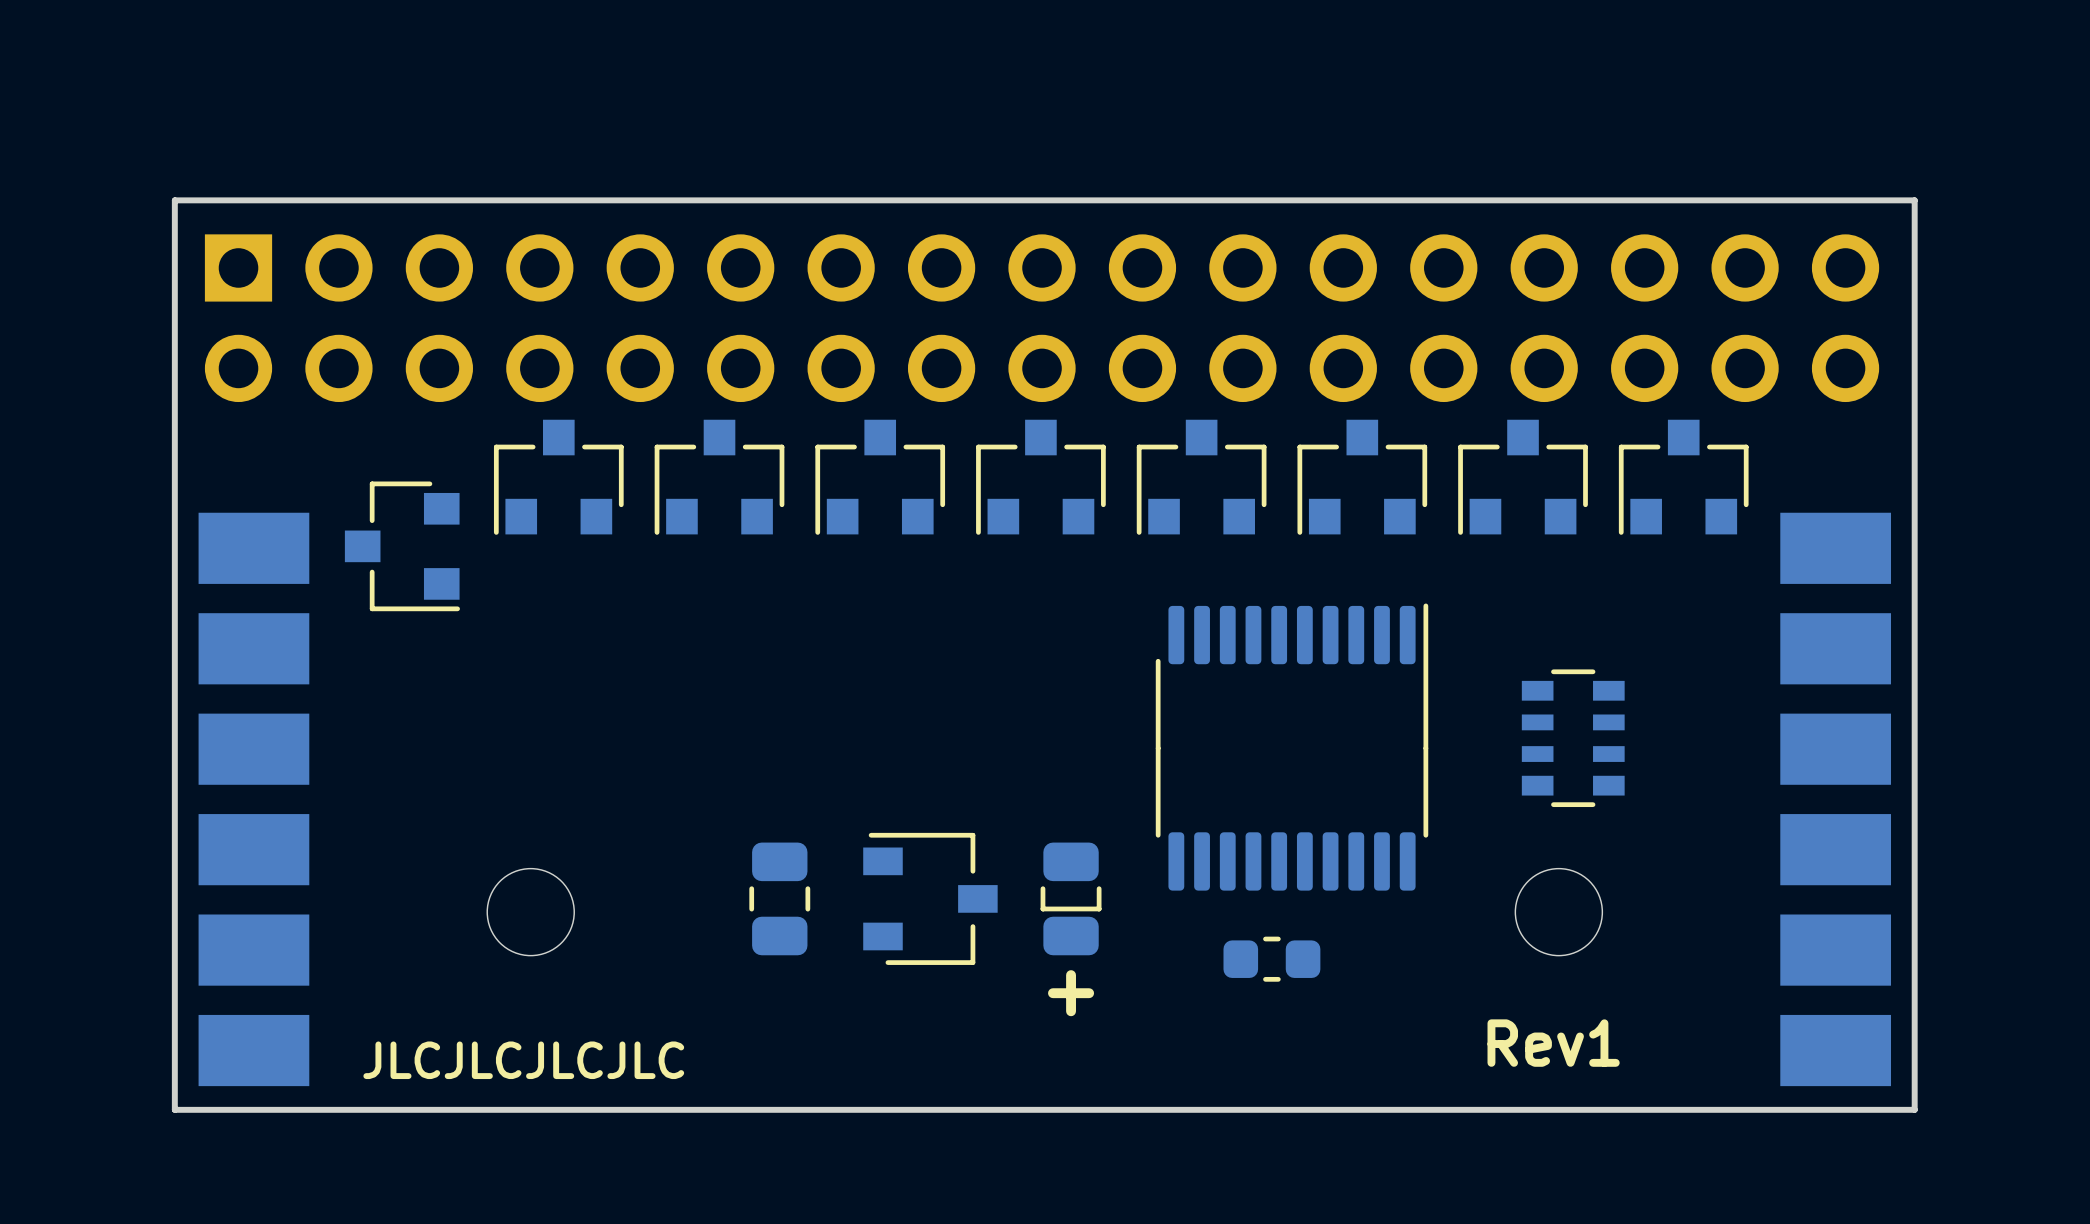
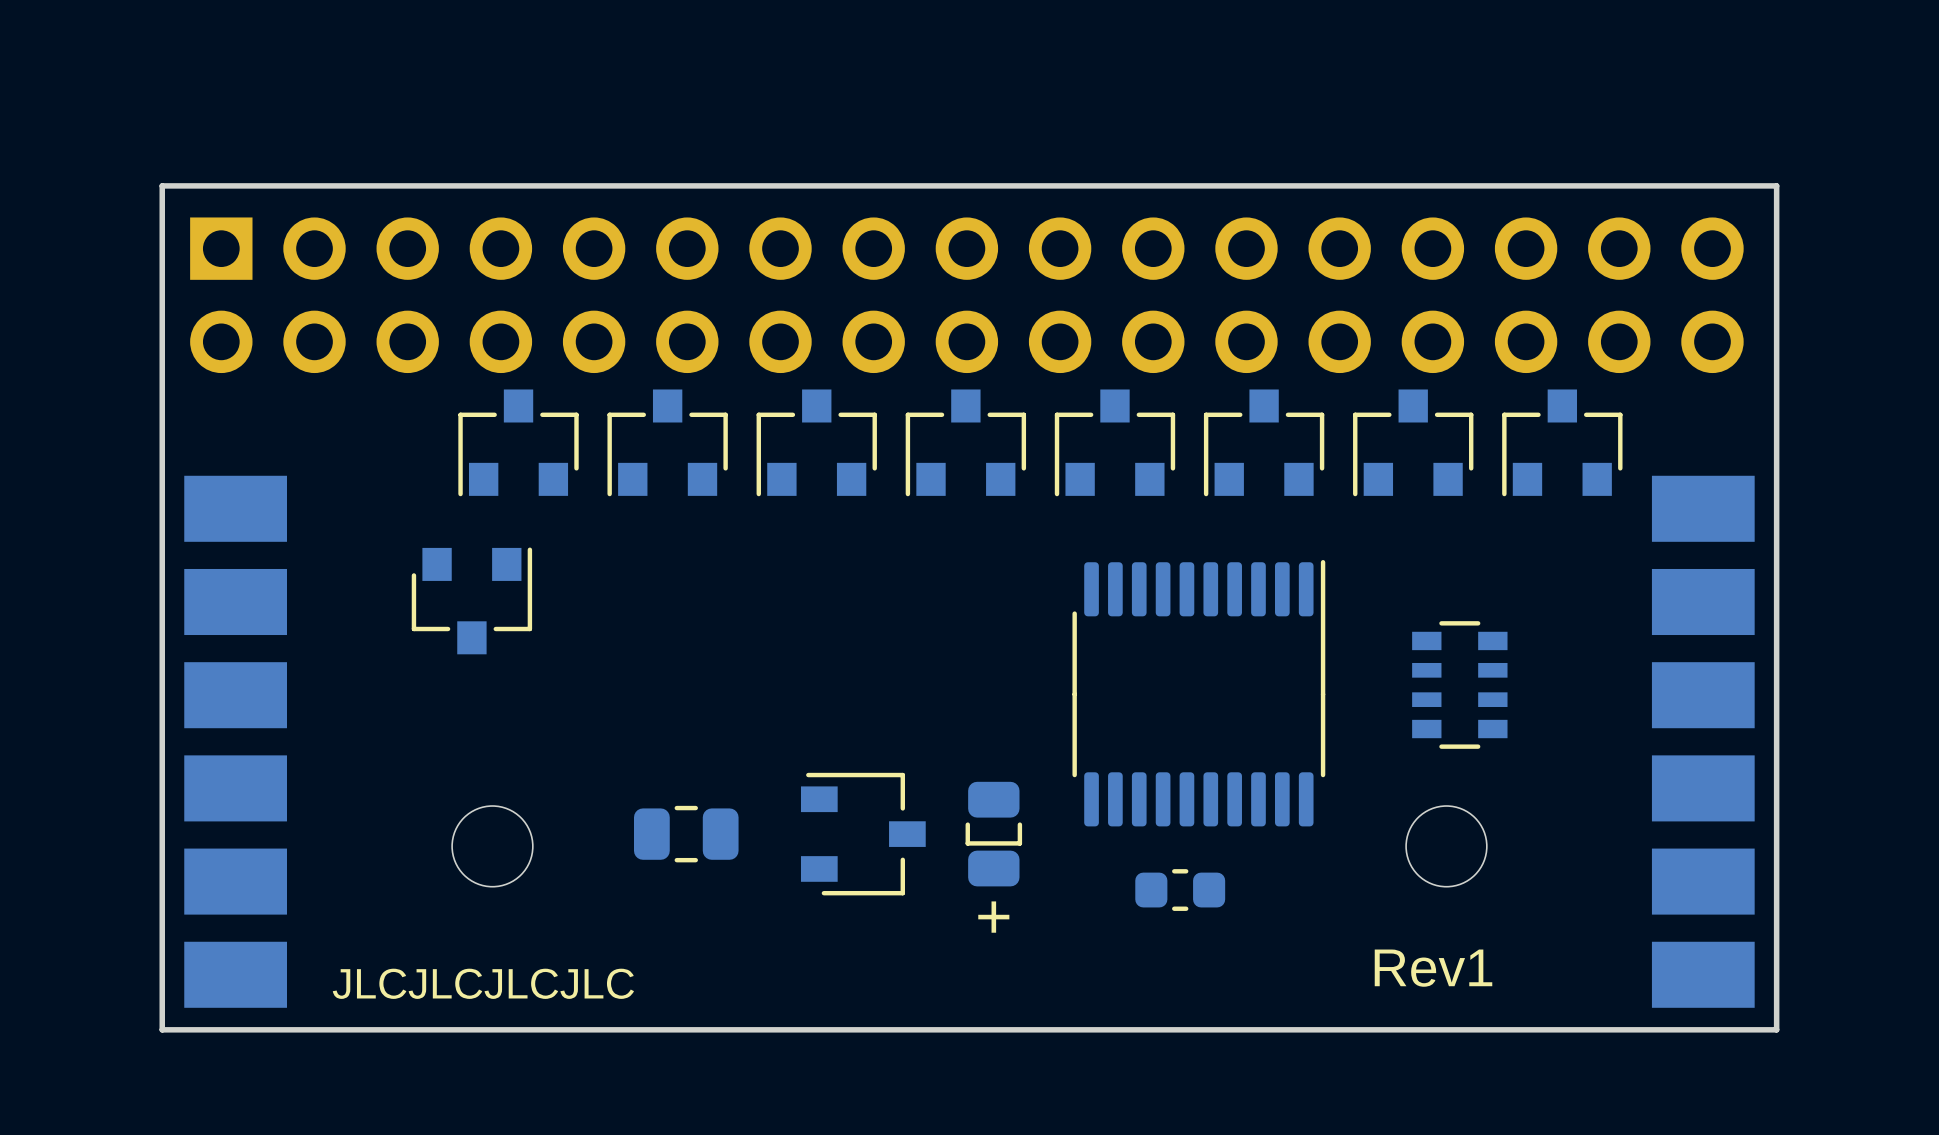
part rotation: 0° (402, 546) -> 90° counterclockwise (471, 600)
part position: (402, 546) -> (471, 600)
part rotation: 0° (779, 898) -> 90° clockwise (686, 834)

